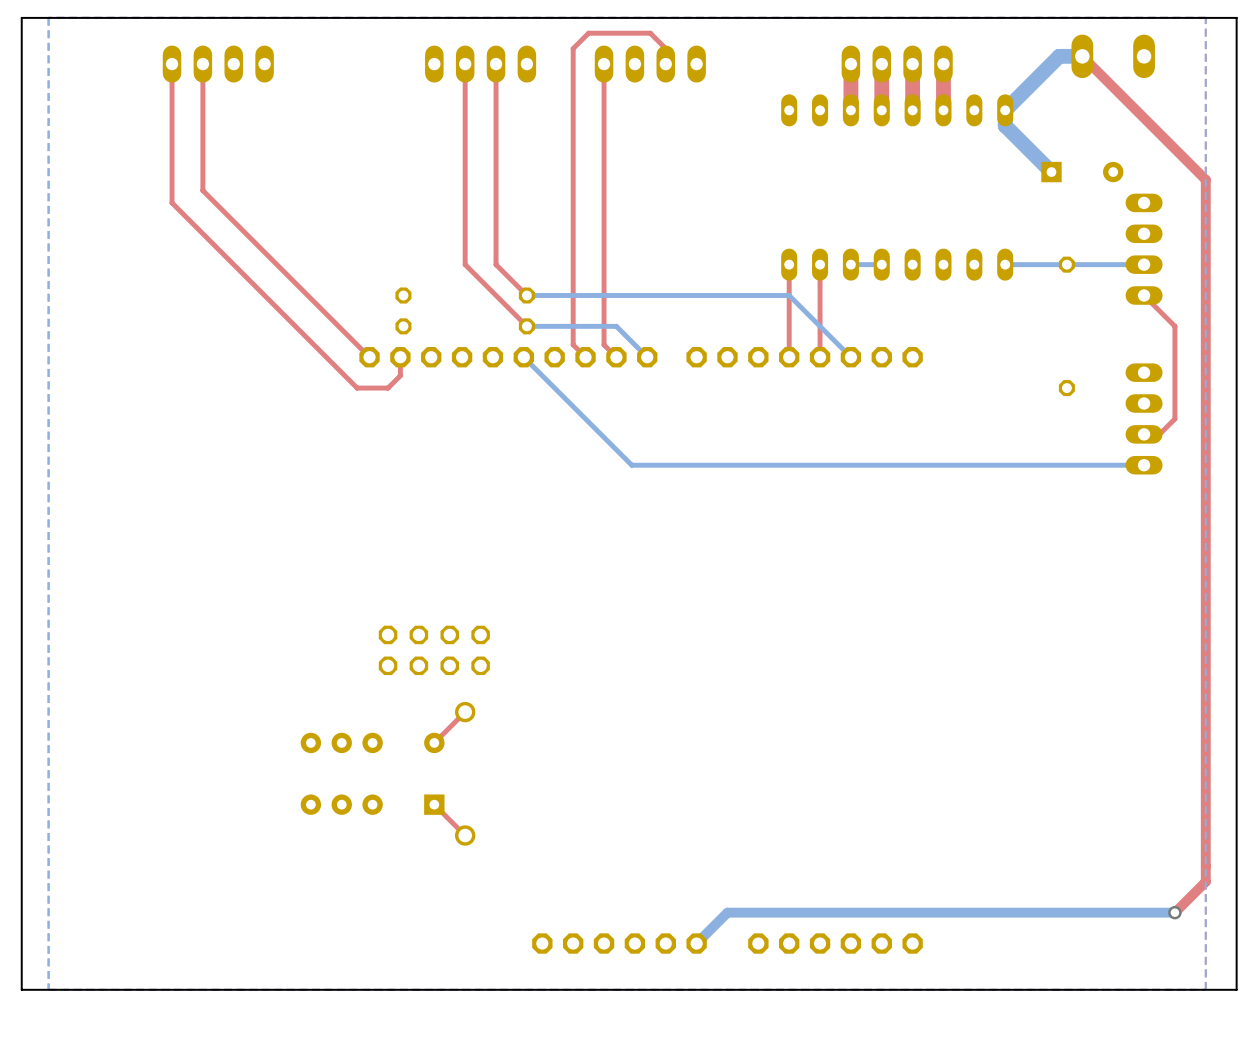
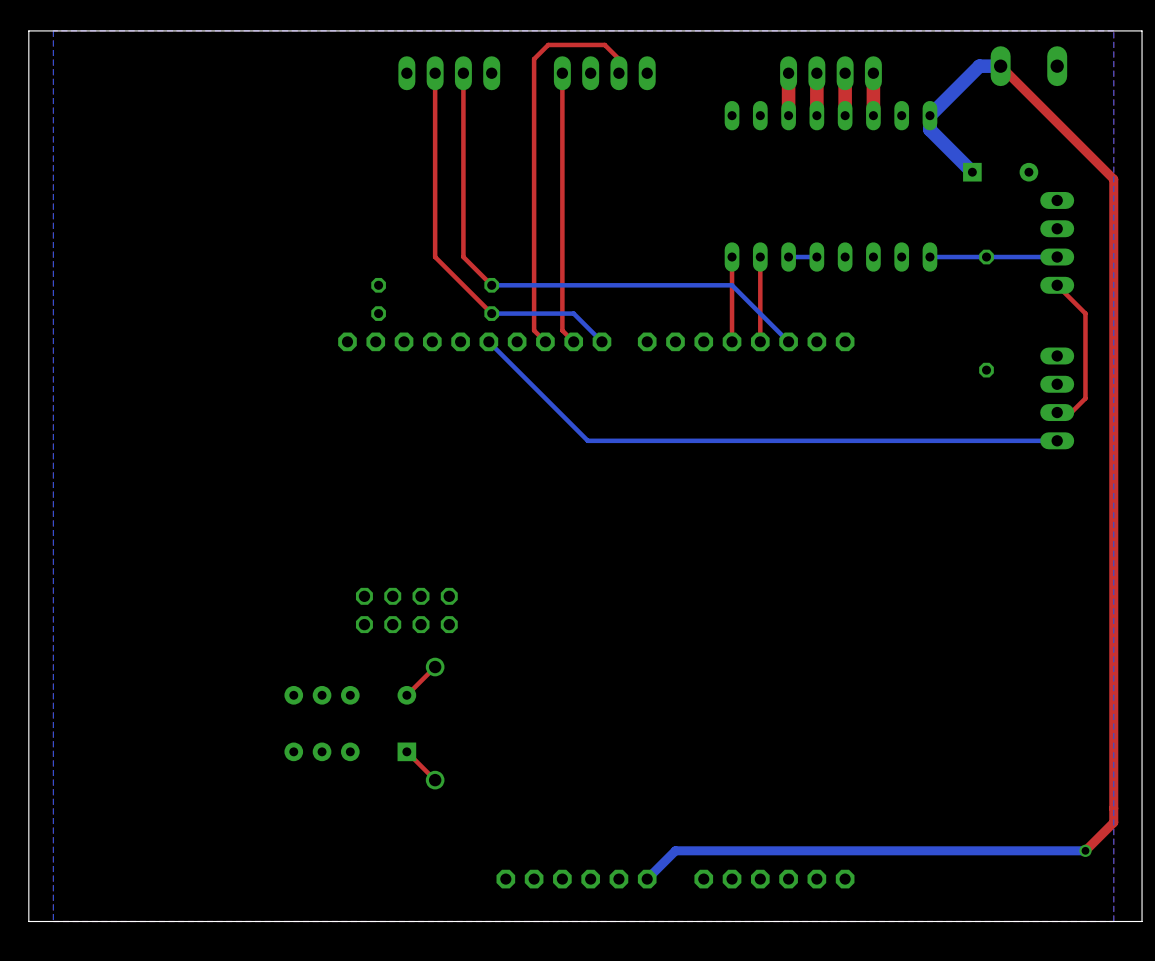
top track: (172, 64) (172, 202) (357, 388) (388, 388) (400, 375) (400, 357) -> none
top track: (202, 64) (202, 190) (369, 357) -> none
part: (218, 64) -> none

